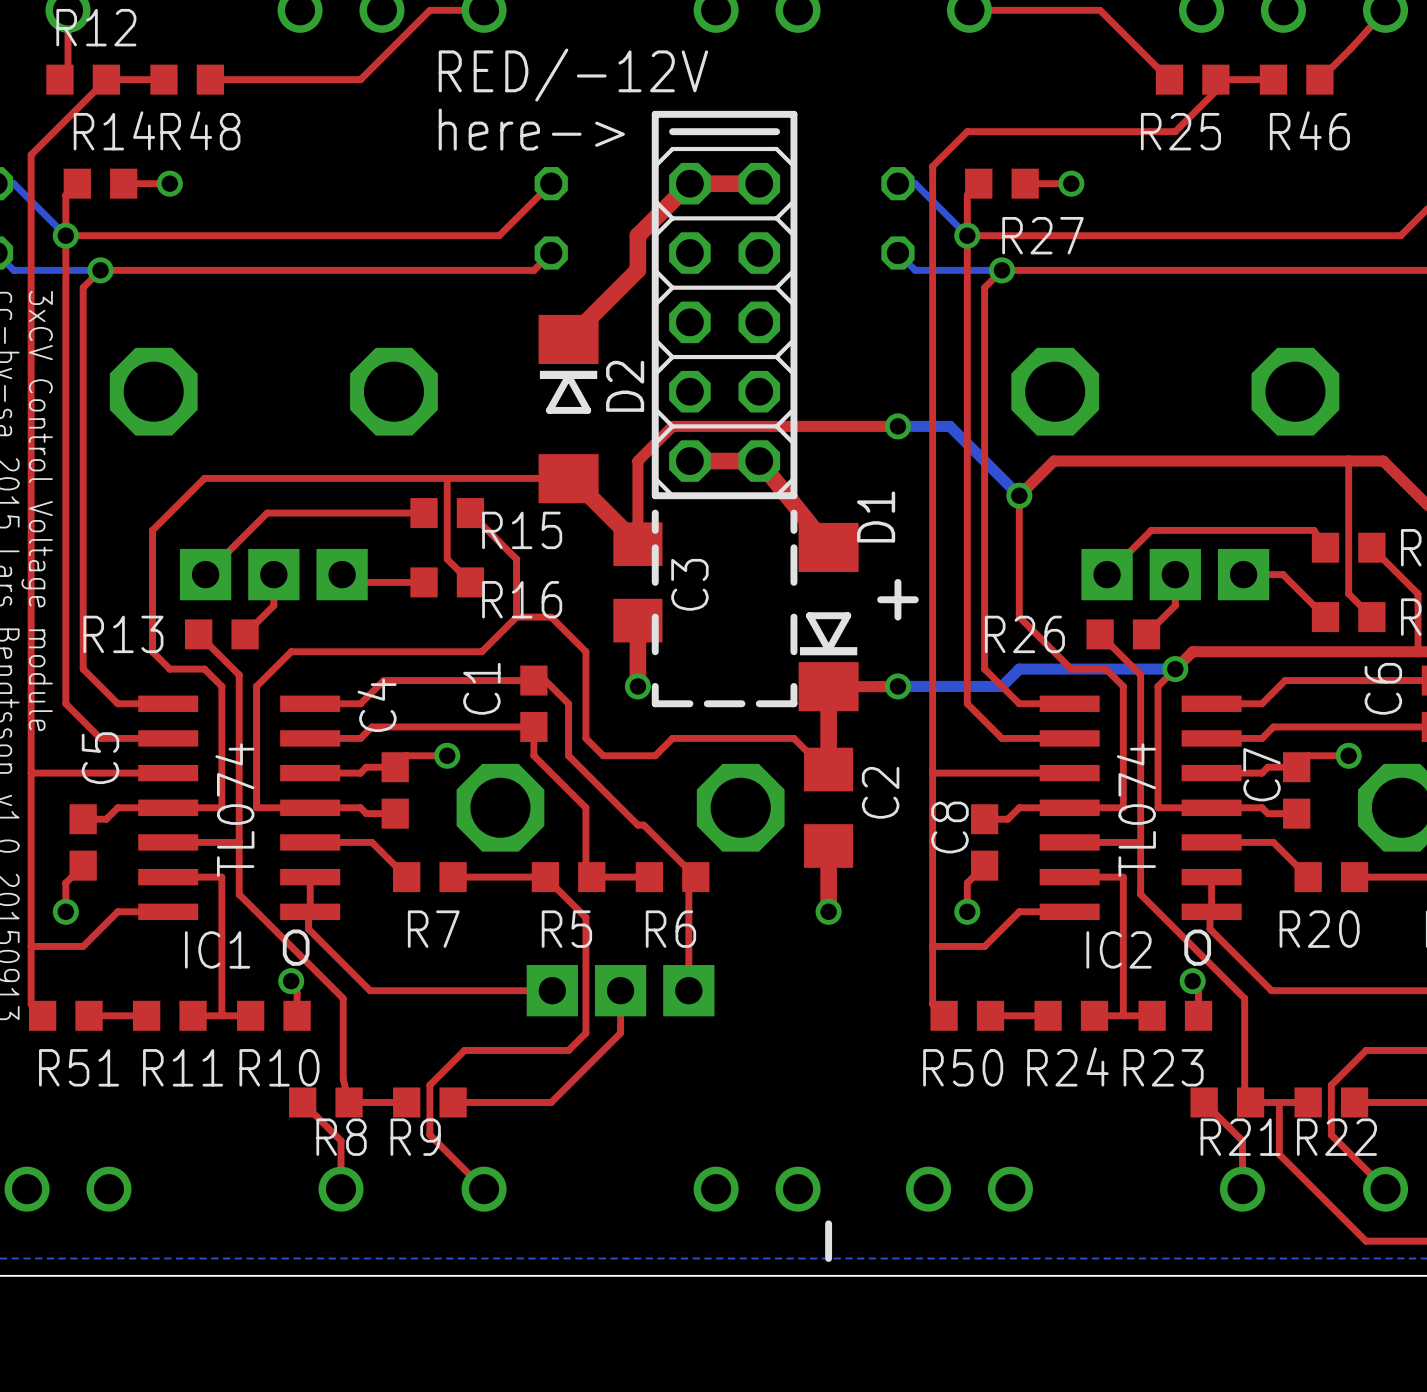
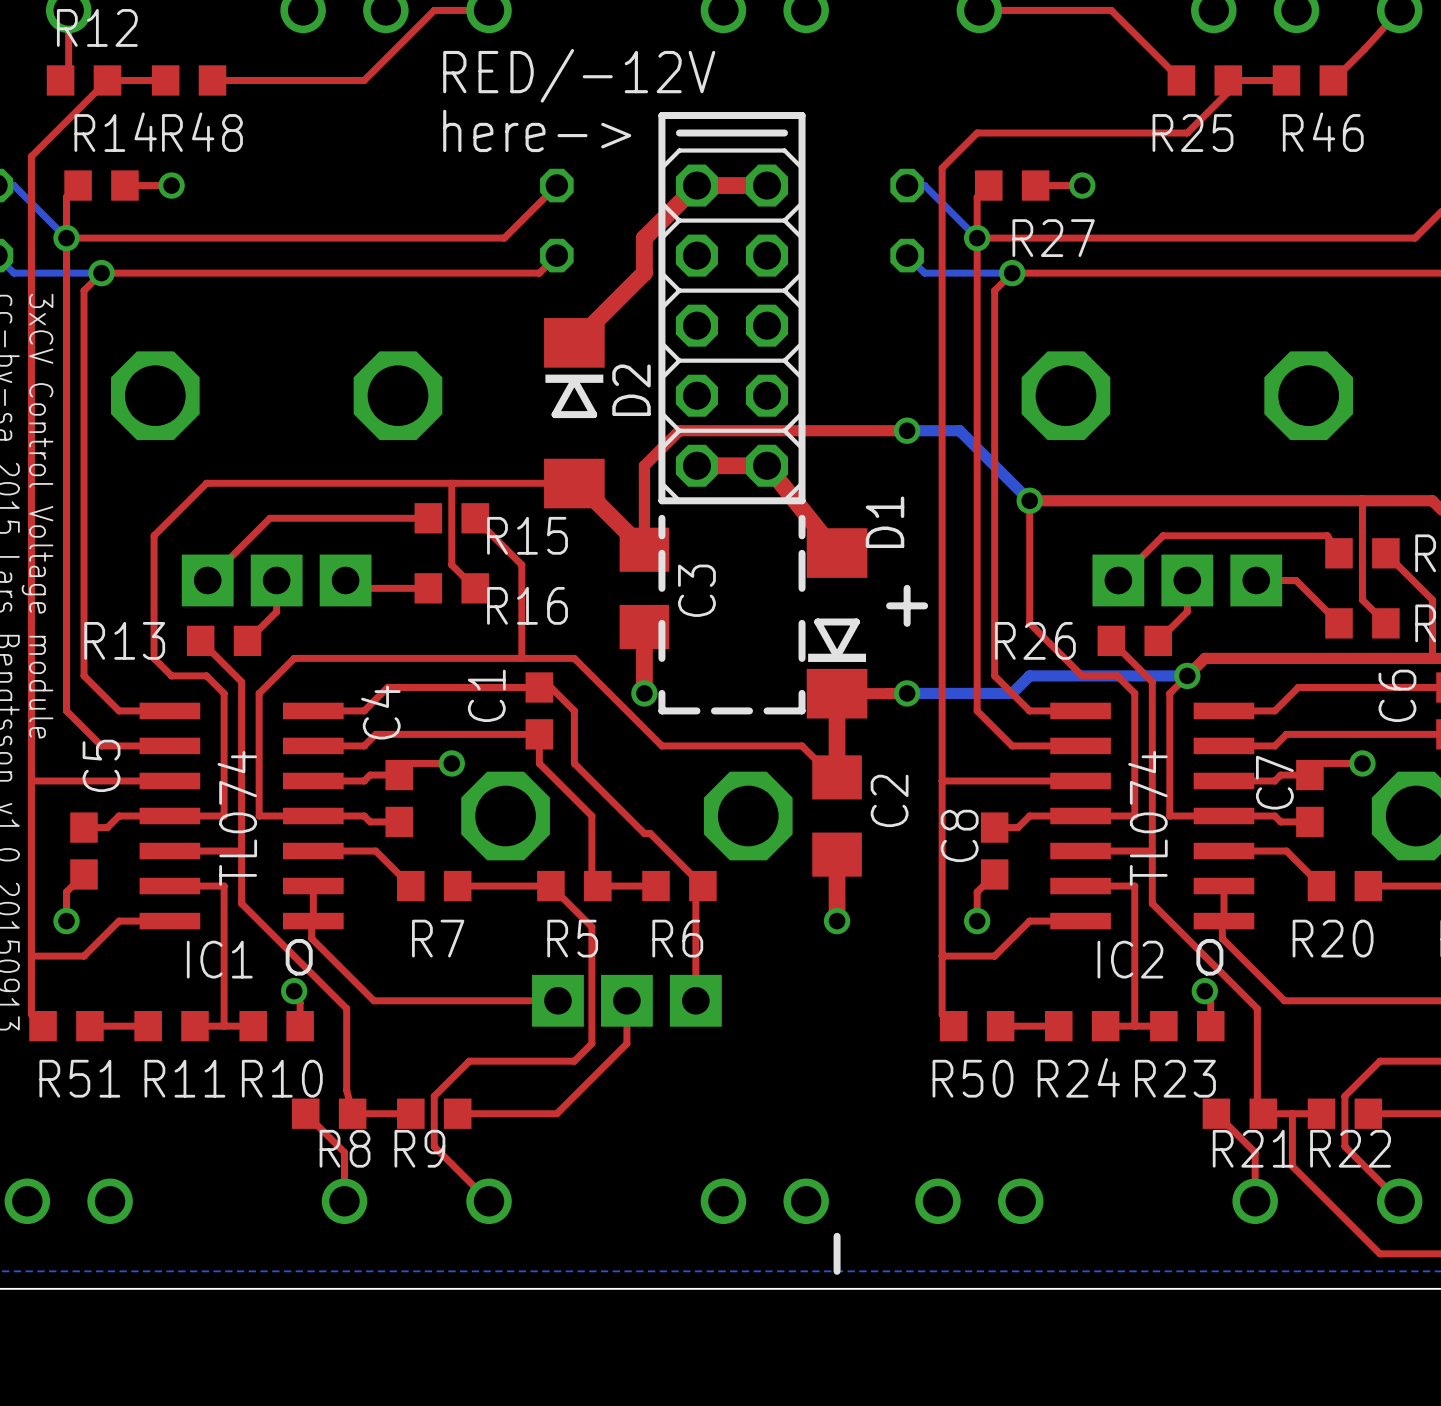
top track: (1348, 461) (1348, 495) -> none
top track: (1019, 495) (1053, 461) (1383, 461) (1418, 495) -> (1029, 500) (1432, 500)
top track: none -> (521, 623) (521, 658)
top track: (481, 651) (516, 617) (551, 617) (585, 651) (585, 738) (603, 755) (655, 755) (672, 738) -> (486, 658) (574, 658) (661, 745) (679, 745)

